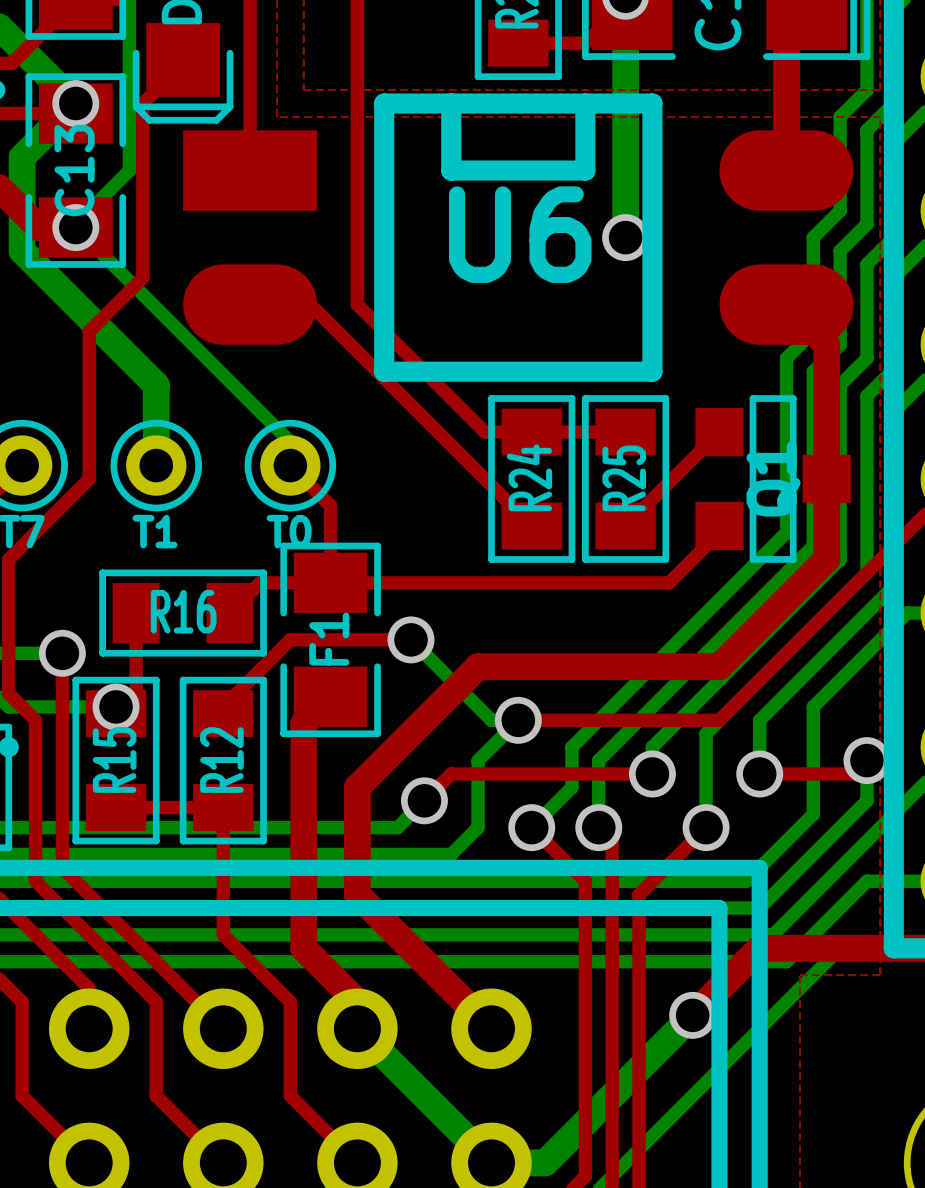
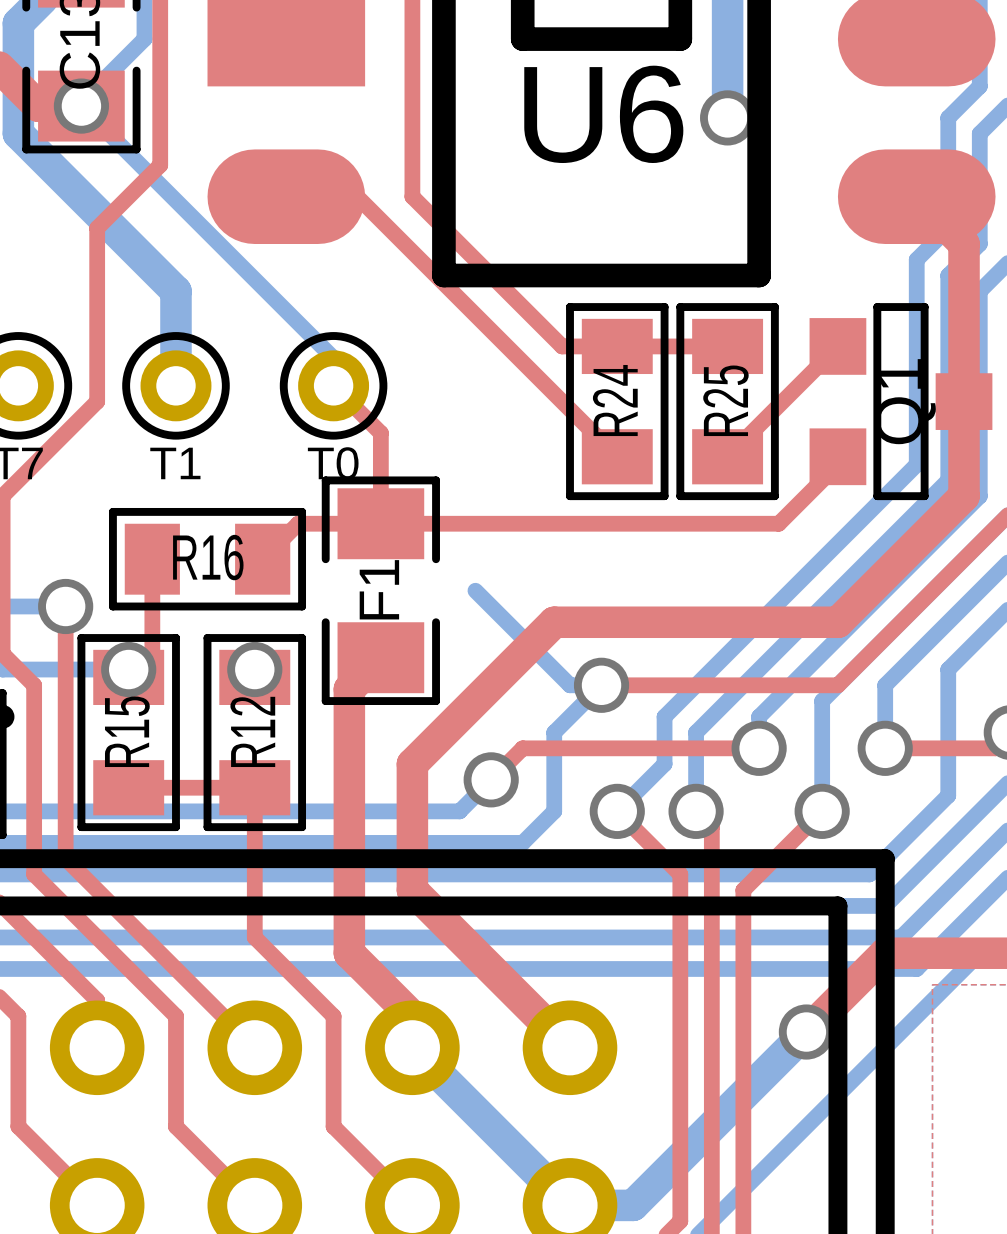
top track: (411, 639) (290, 639) (223, 706) -> none
via position: (411, 639) -> (254, 669)

